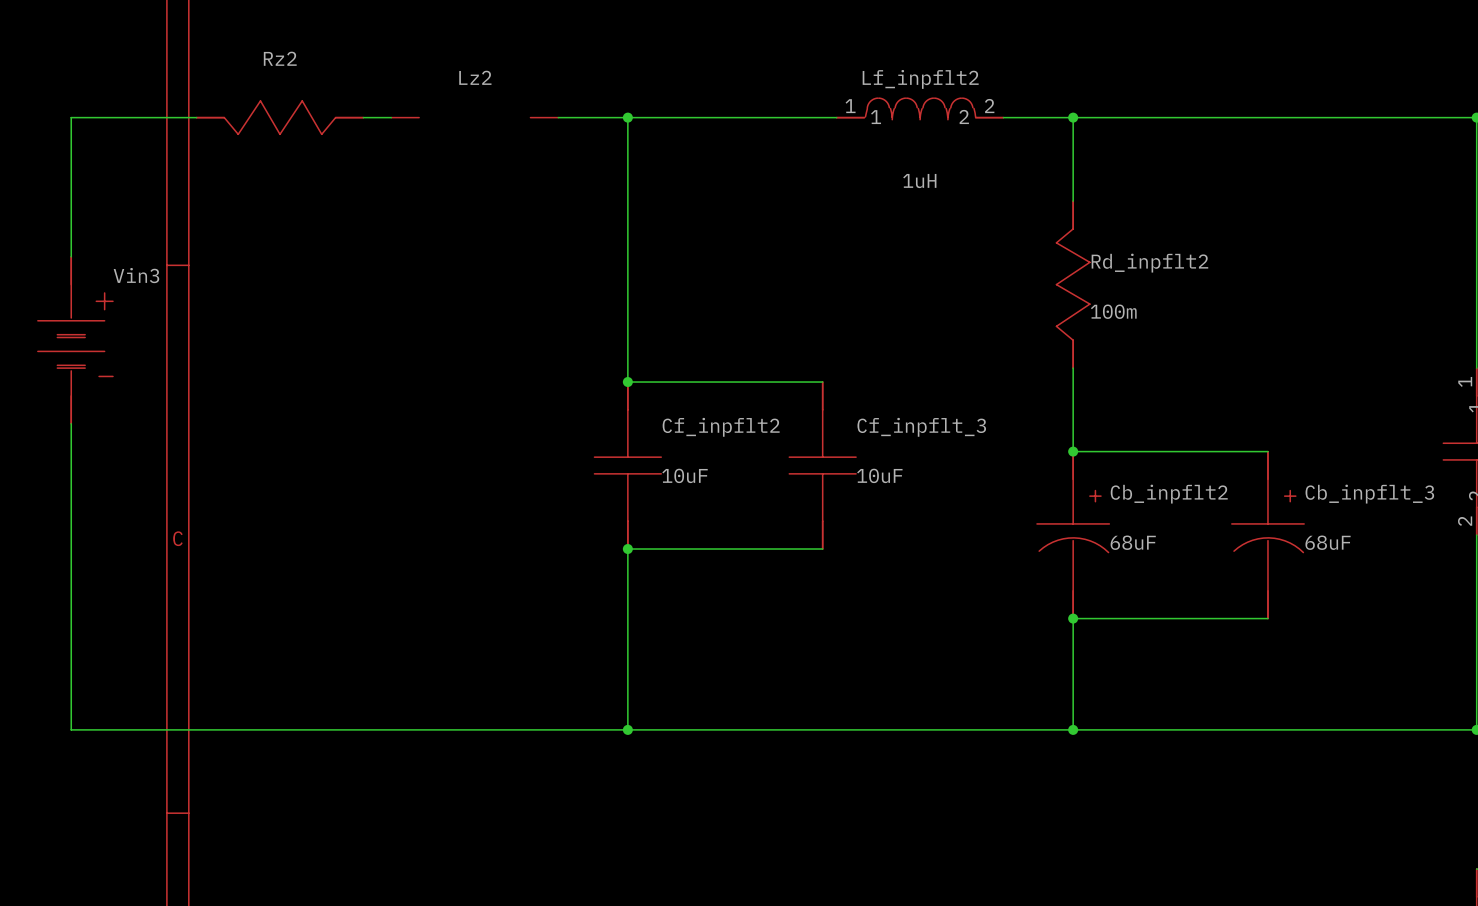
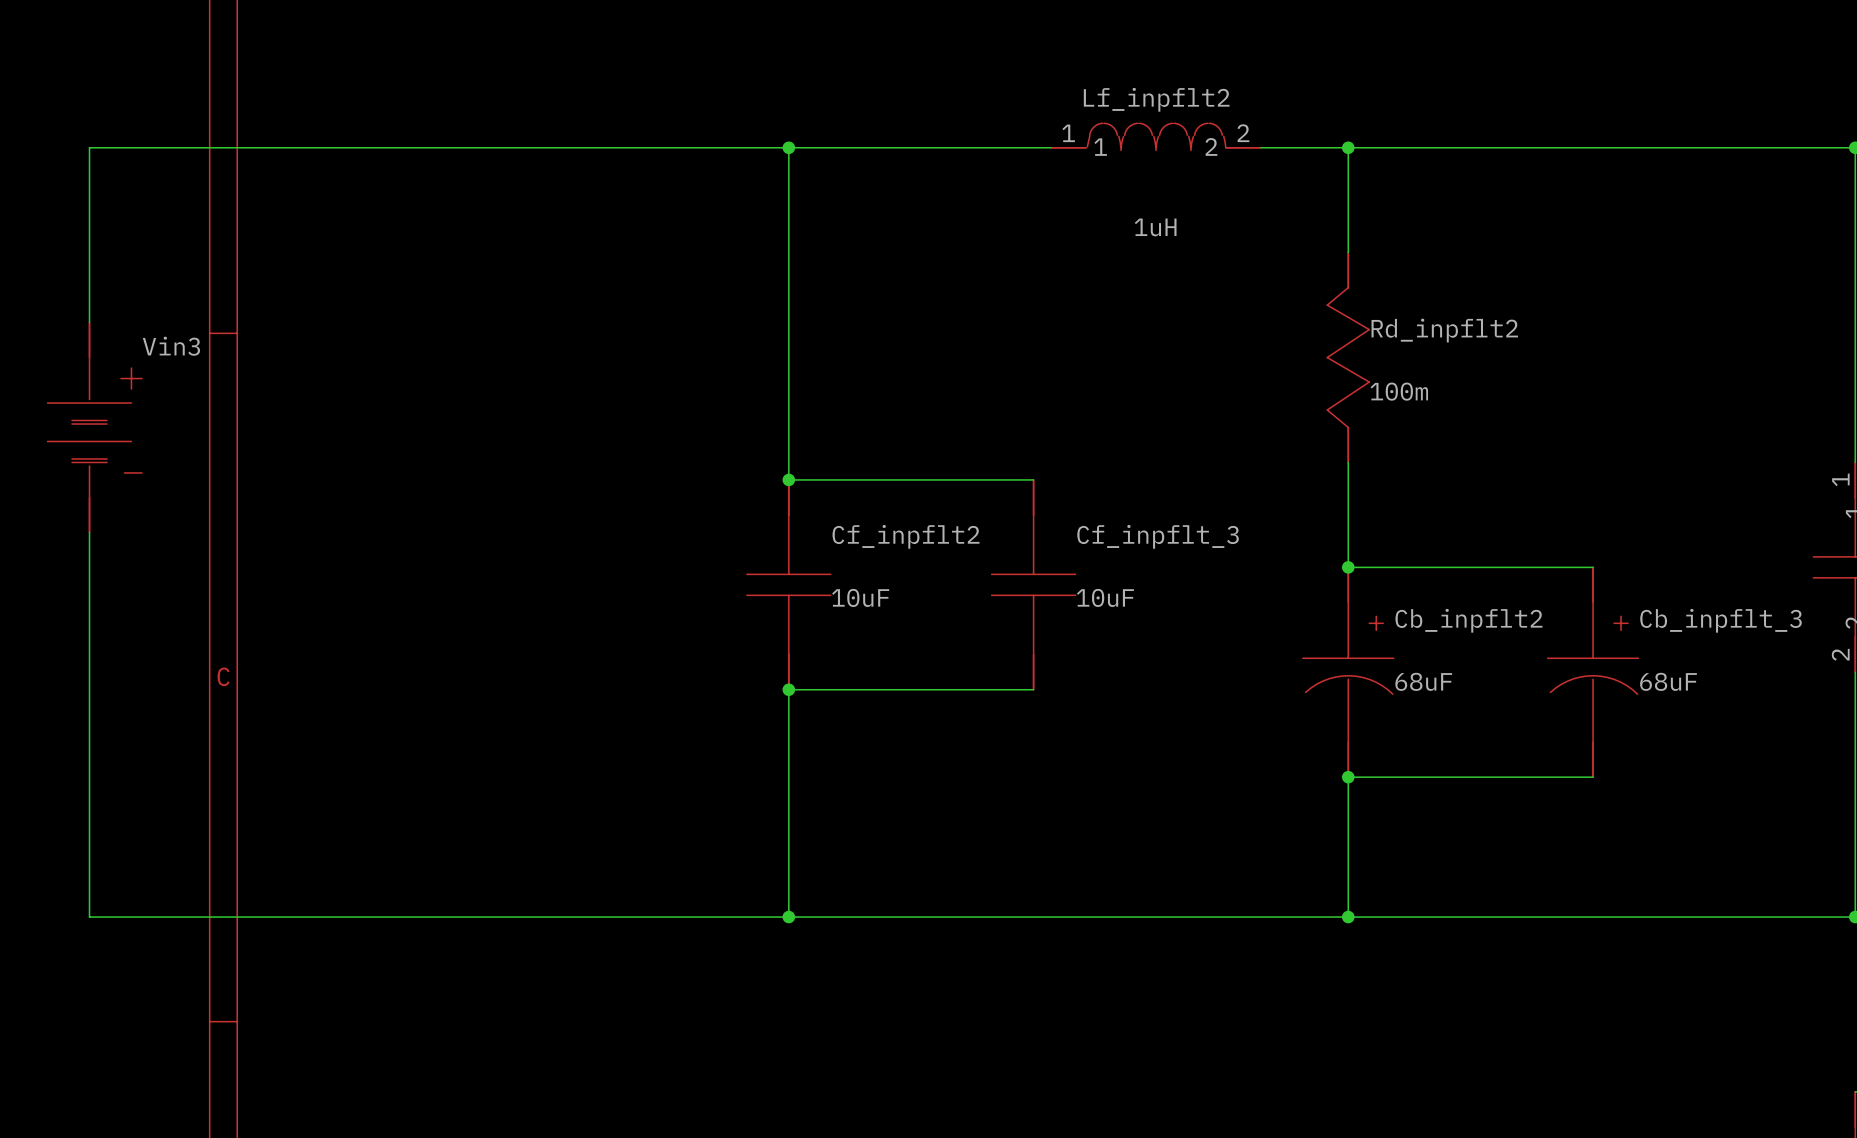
wire: none -> (246, 147) (456, 147)
Rz2: (279, 117) -> none
wire: none -> (491, 147) (701, 147)
Lz2: (474, 117) -> none

